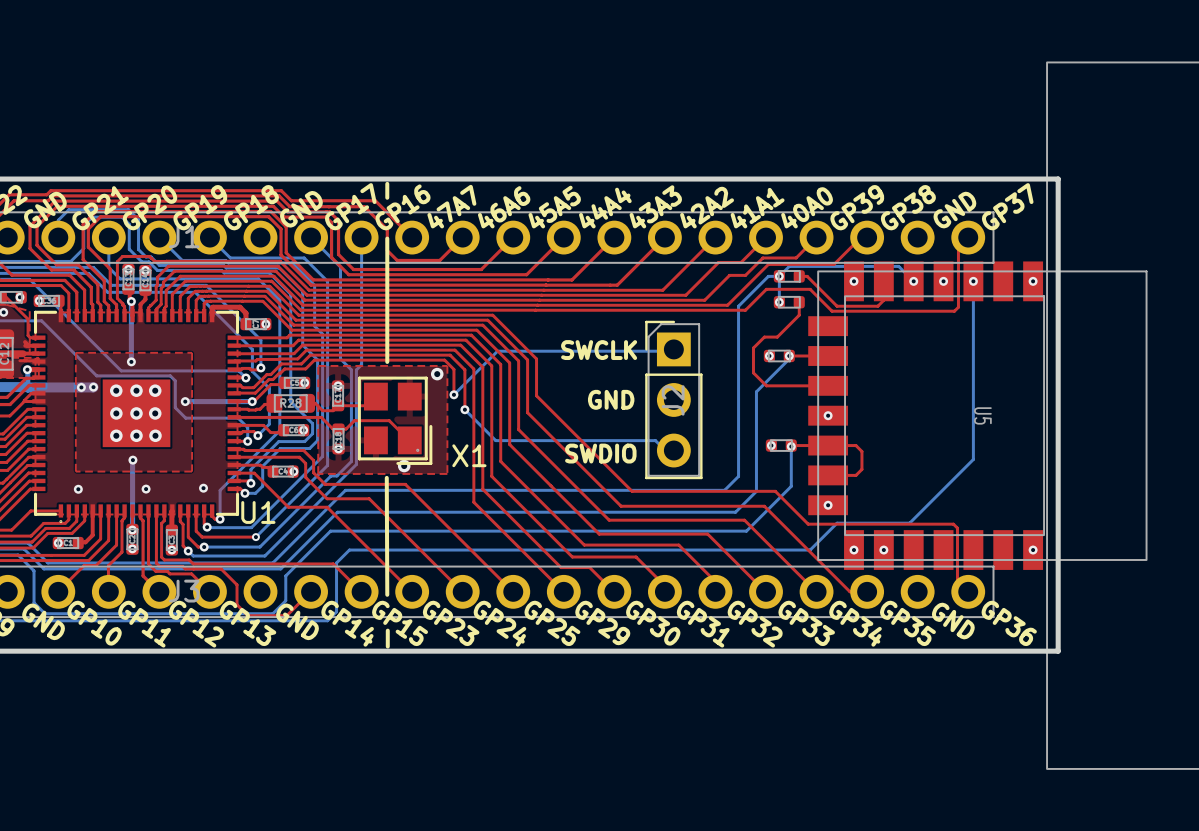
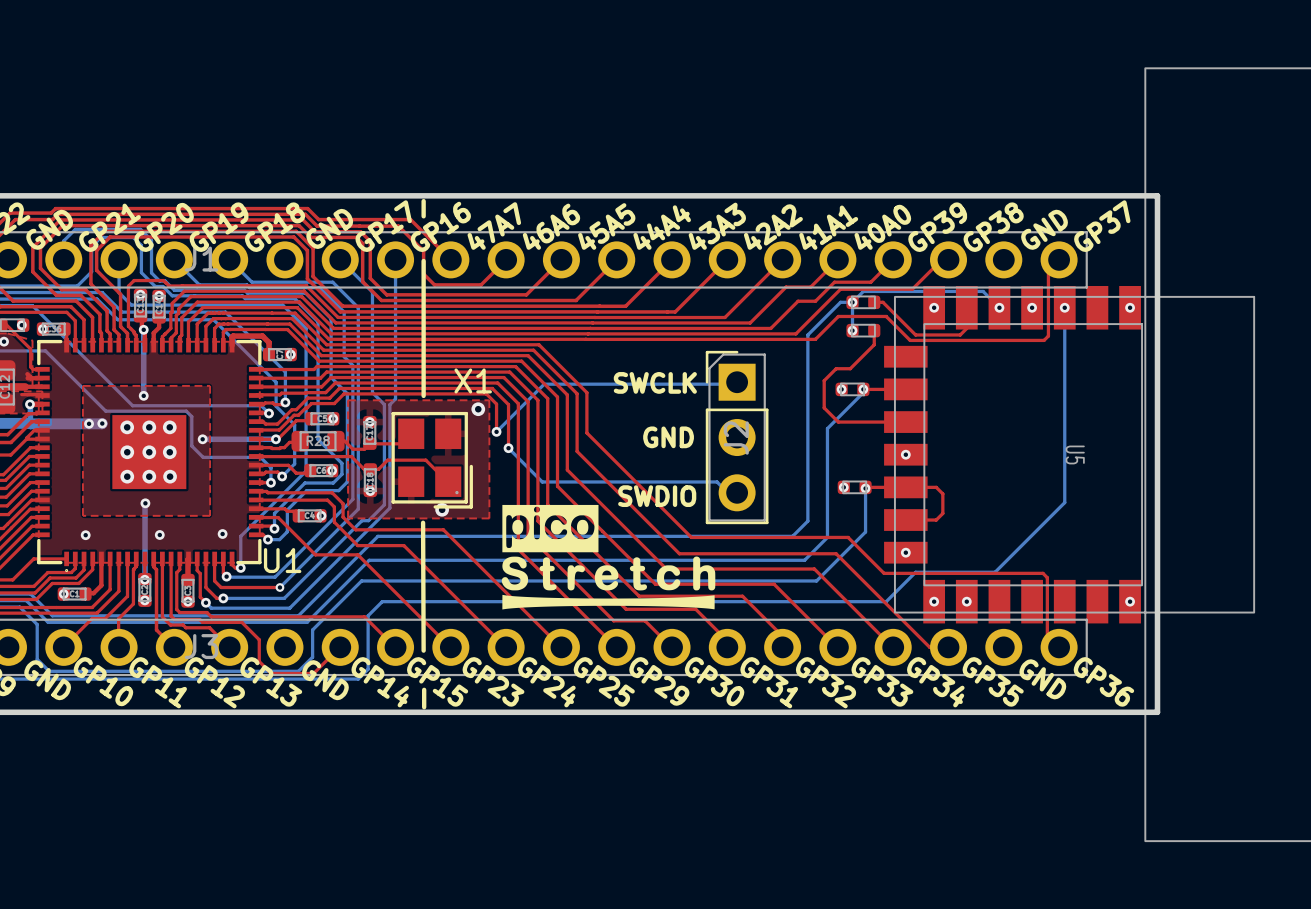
X1 name position: X1 (469, 455) -> X1 (473, 380)
drawing: none -> [501, 504, 716, 610]

